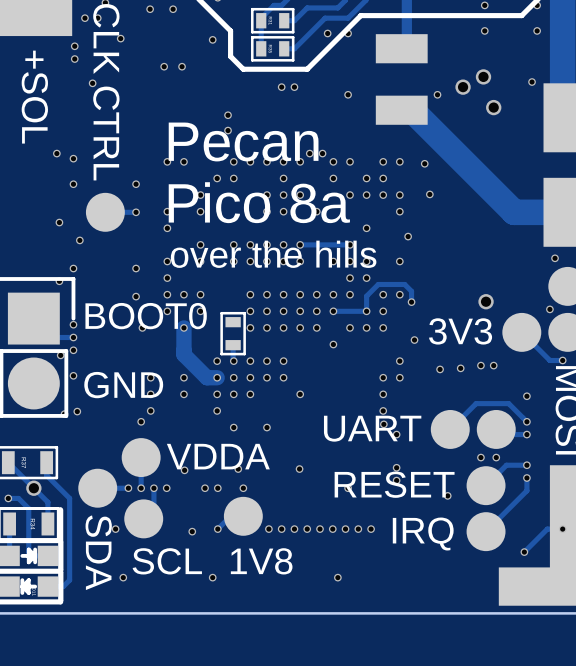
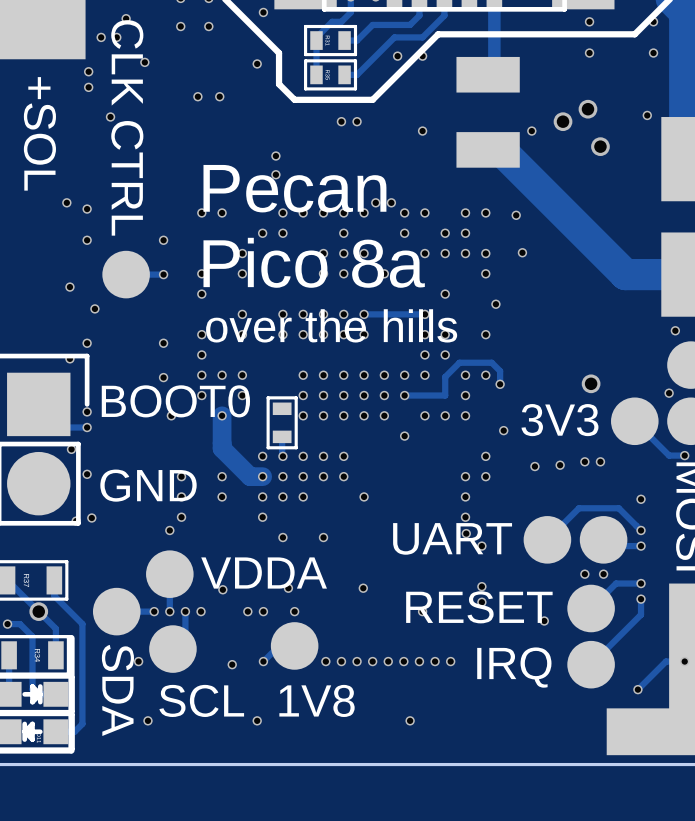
via: (333, 261) -> none
via: (366, 311) -> none
via: (73, 350) -> none

